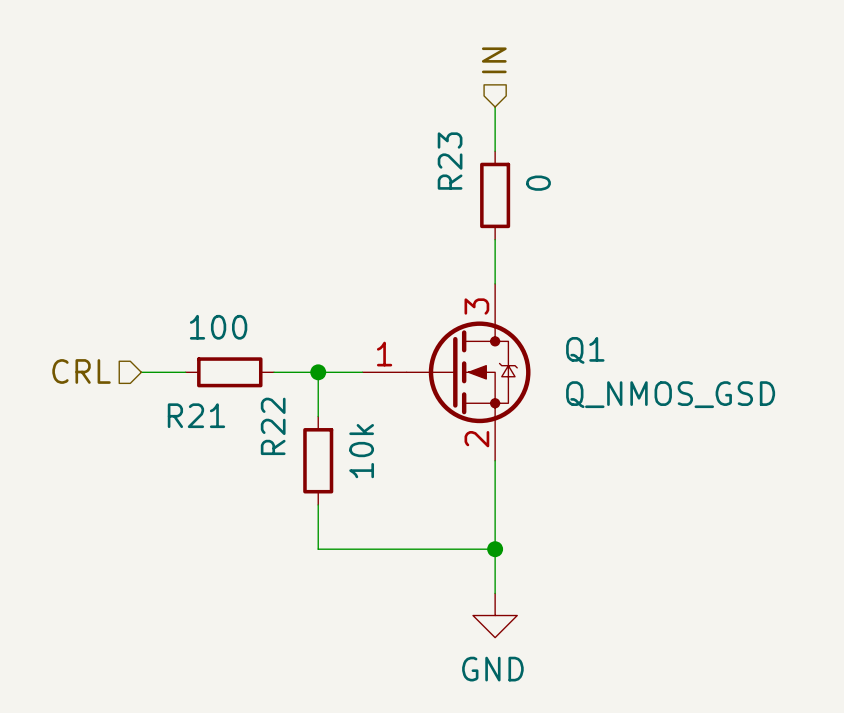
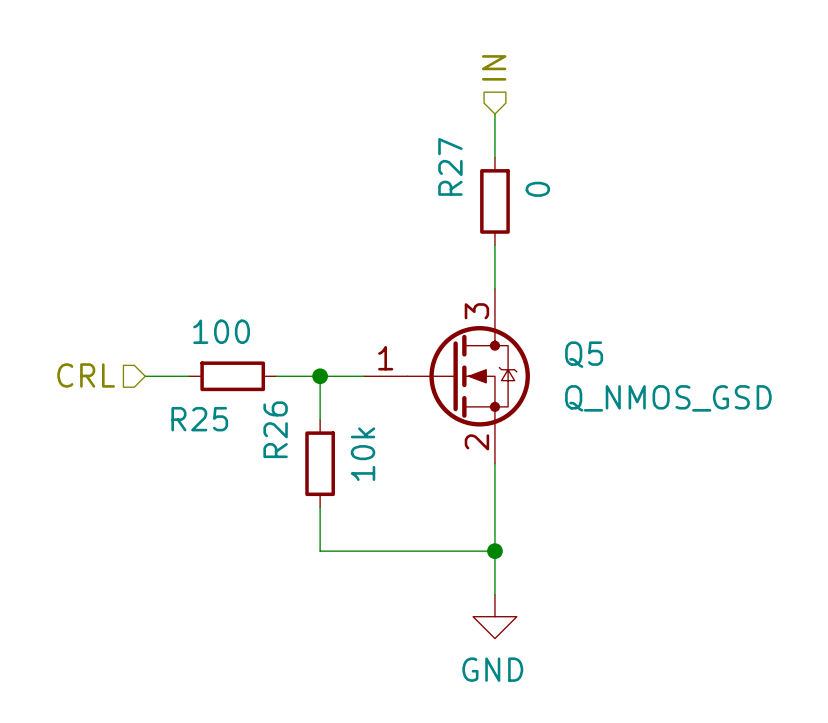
R23 name: R23 (450, 161) -> R27 (450, 166)
Q1 name: Q1 (585, 350) -> Q5 (584, 354)
R21 name: R21 (196, 415) -> R25 (199, 419)
R22 name: R22 (273, 426) -> R26 (275, 429)

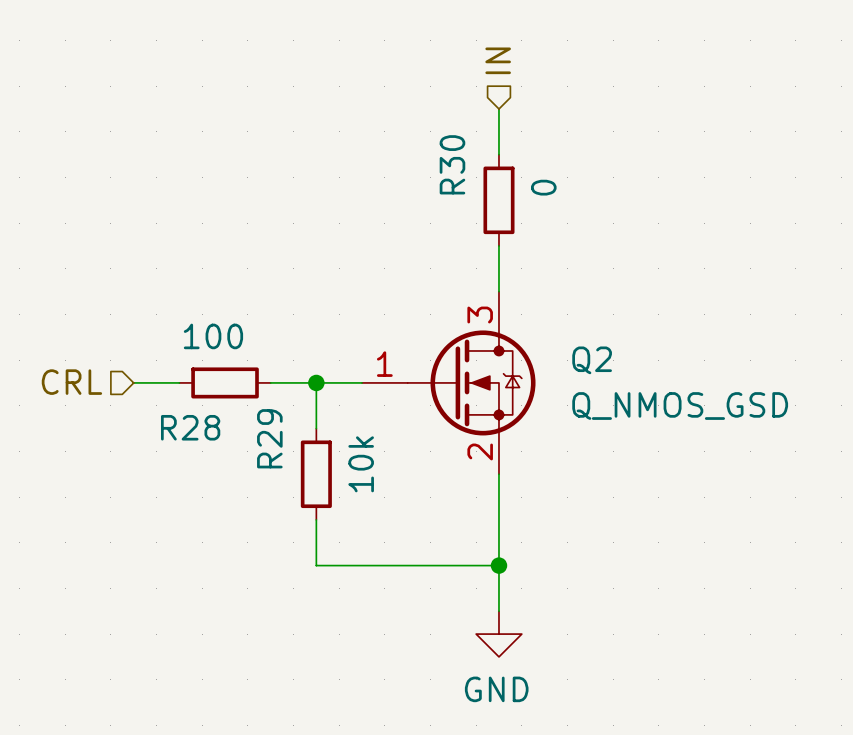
R27 name: R27 (450, 166) -> R30 (452, 164)
Q5 name: Q5 (584, 354) -> Q2 (592, 360)
R25 name: R25 (199, 419) -> R28 (190, 427)
R26 name: R26 (275, 429) -> R29 (269, 438)

